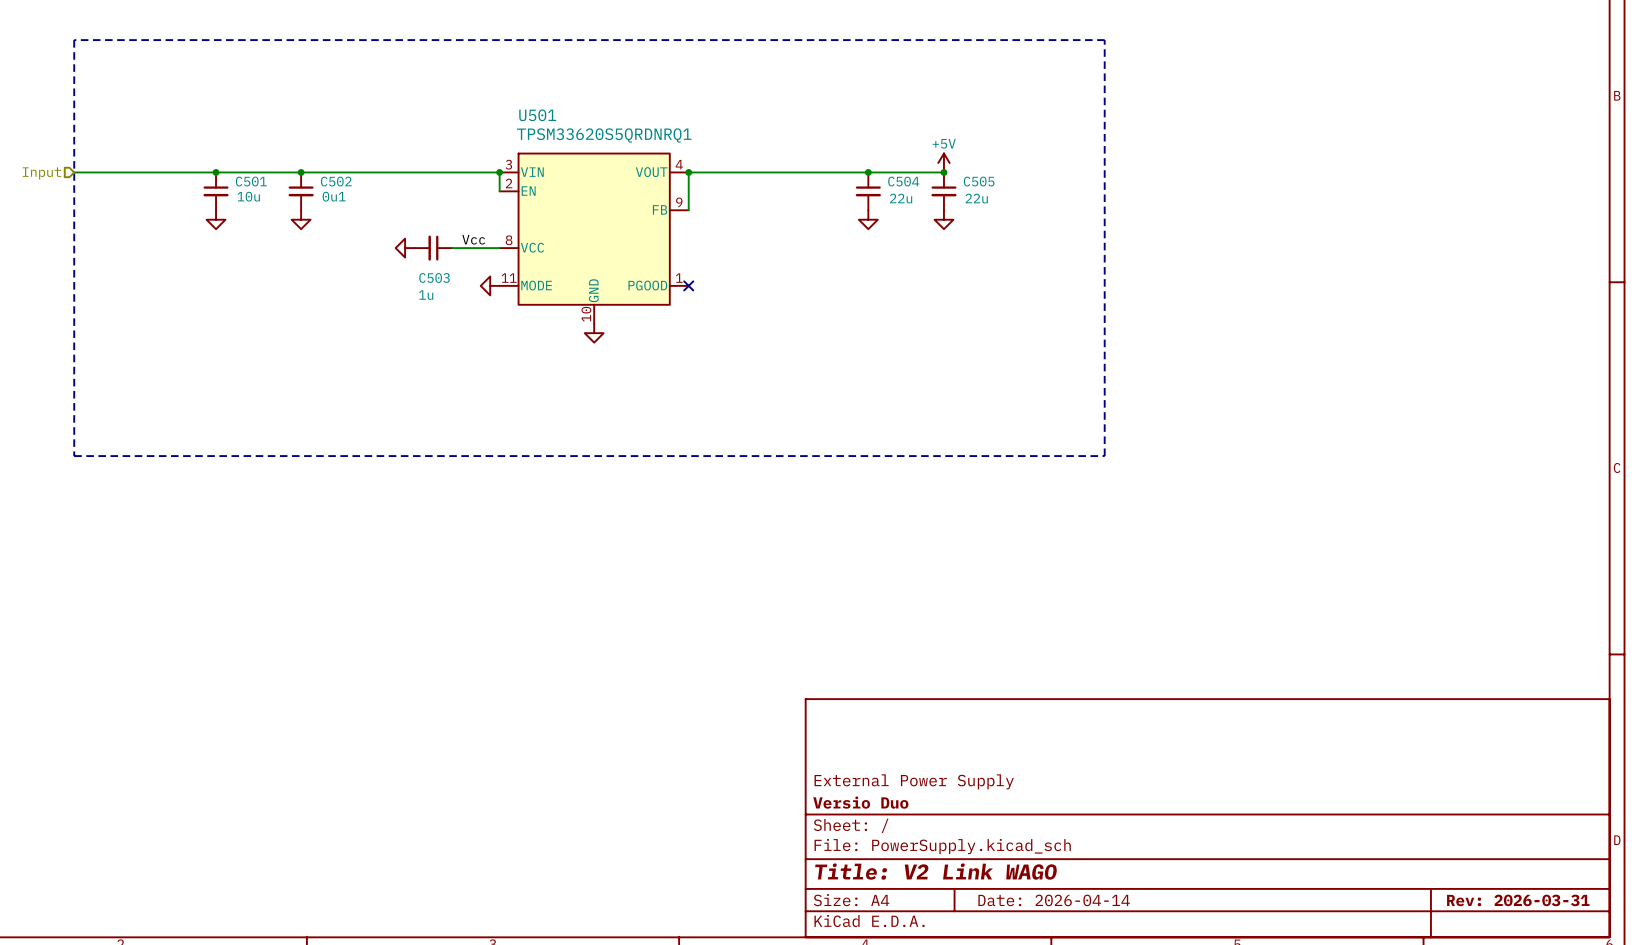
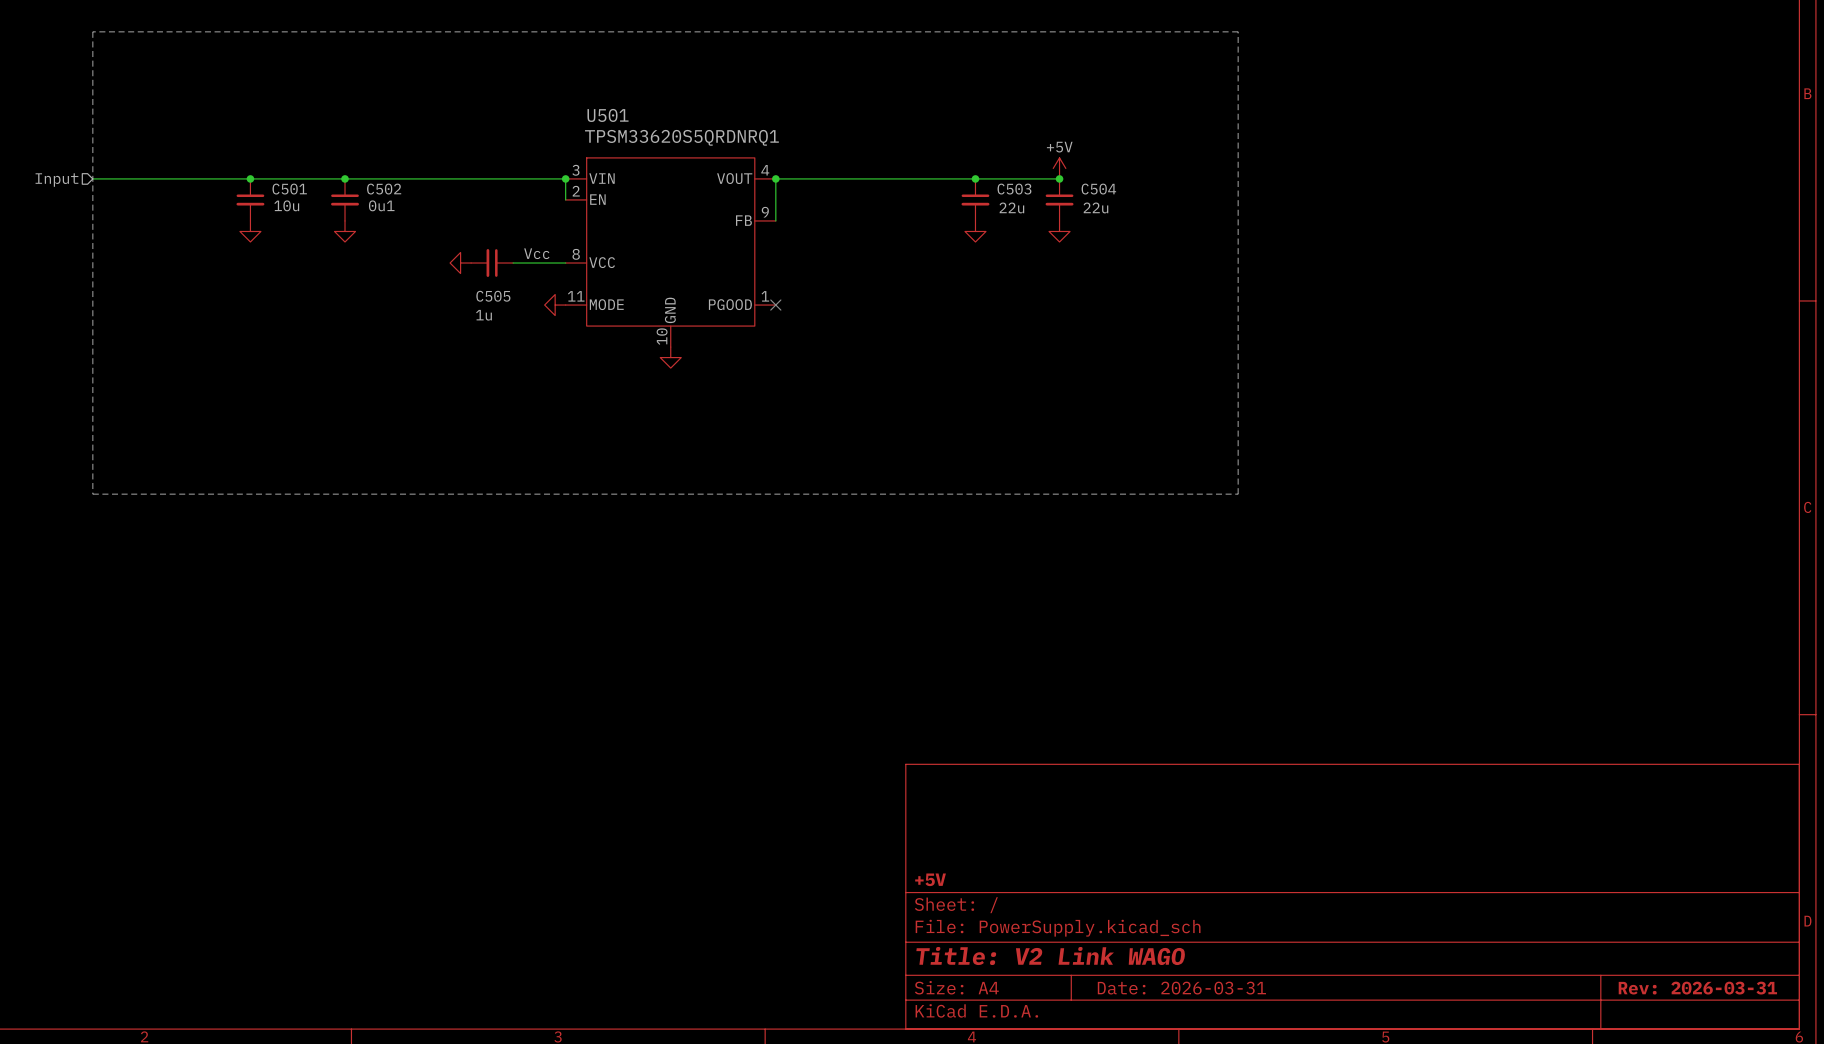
C504 name: C504 (903, 181) -> C503 (1014, 189)
C505 name: C505 (979, 181) -> C504 (1098, 189)
C503 name: C503 (434, 277) -> C505 (493, 296)
title block: External Power Supply (914, 781) -> none
title block: Versio Duo (860, 802) -> +5V (930, 879)
title block: Date: 2026-04-14 (1054, 900) -> Date: 2026-03-31 (1181, 988)

